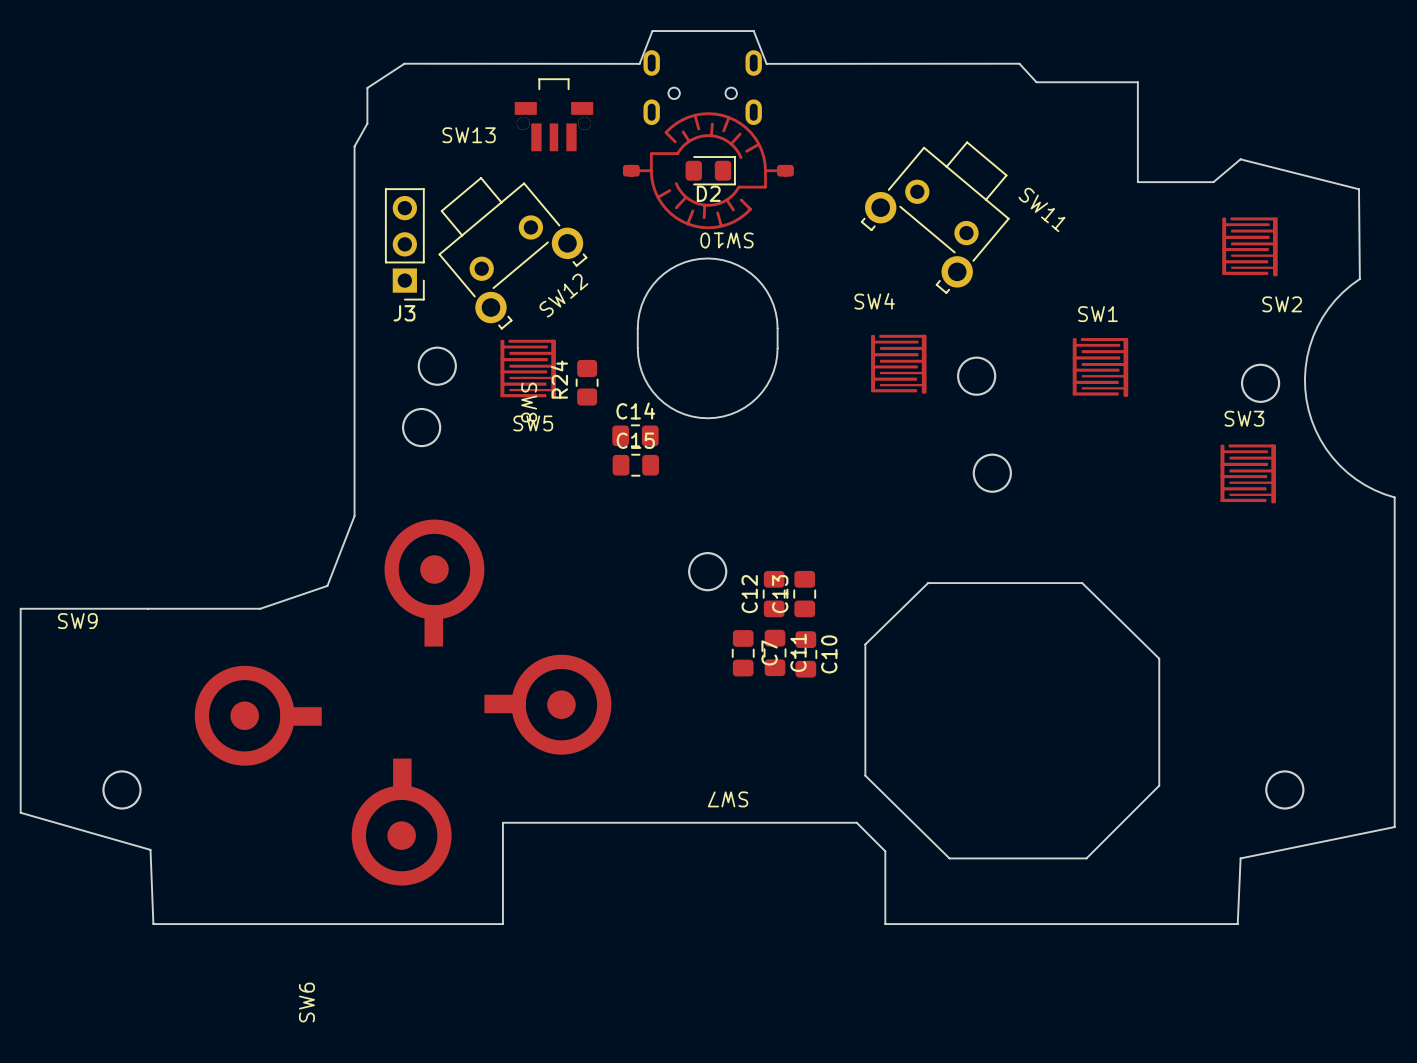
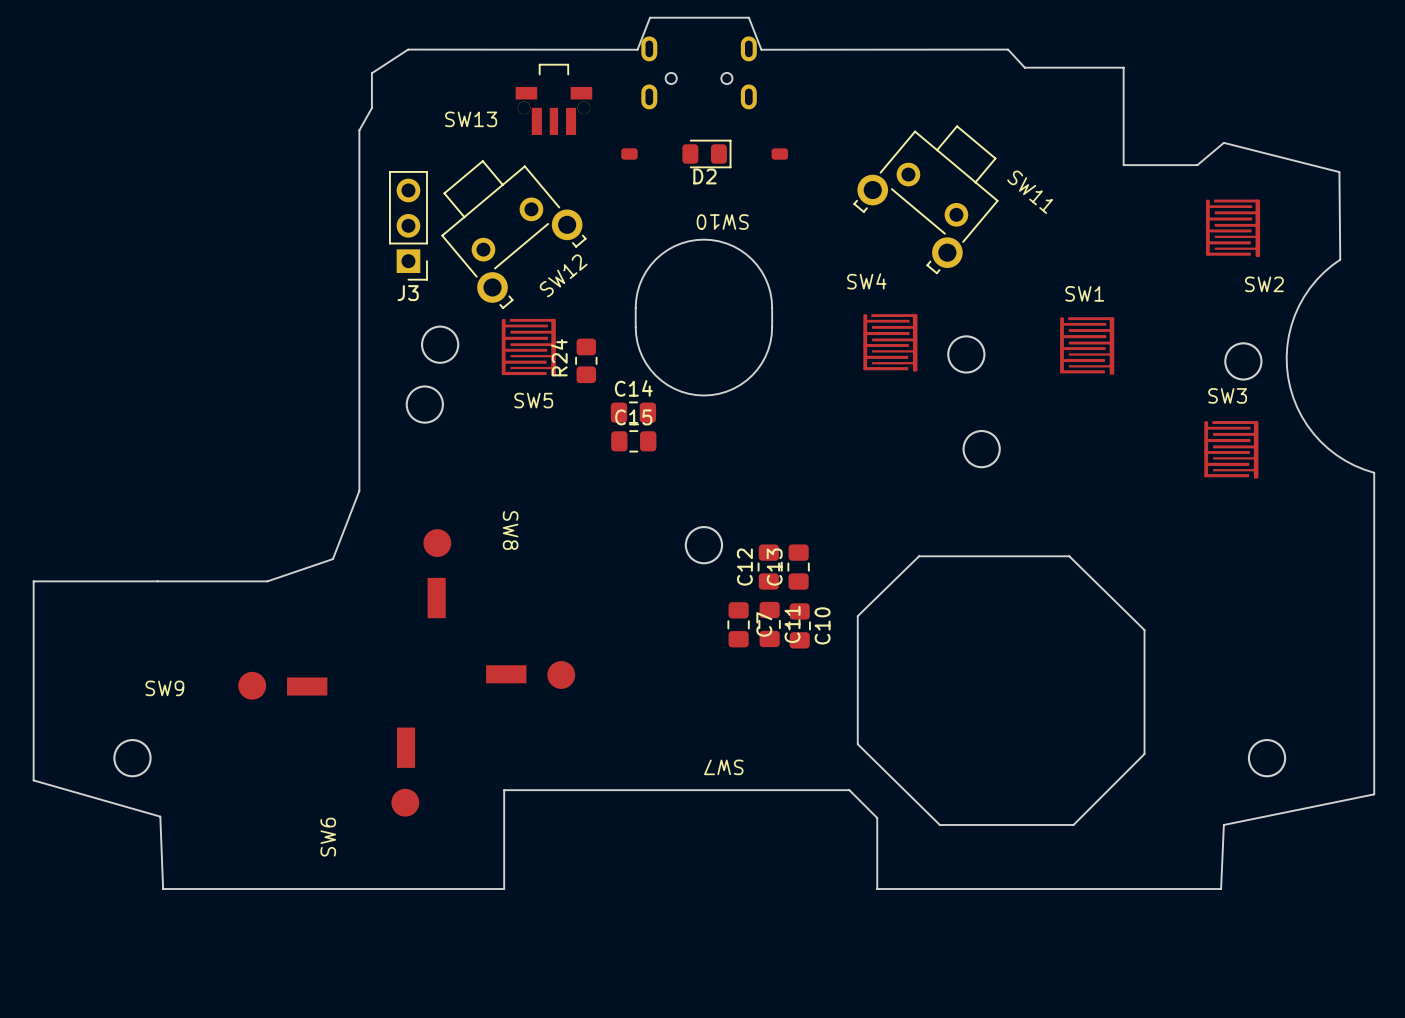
SW10 footprint: [622, 112, 794, 230] -> [621, 148, 789, 160]
SW8 name position: SW8 (529, 402) -> SW8 (510, 530)
SW8 footprint: [384, 519, 485, 647] -> [423, 529, 452, 619]
SW9 name position: SW9 (77, 621) -> SW9 (164, 688)
SW7 footprint: [484, 654, 612, 755] -> [486, 661, 576, 689]
SW9 footprint: [194, 665, 322, 766] -> [238, 671, 328, 700]
SW6 footprint: [351, 758, 452, 886] -> [391, 727, 420, 817]
SW6 name position: SW6 (306, 1002) -> SW6 (328, 837)

